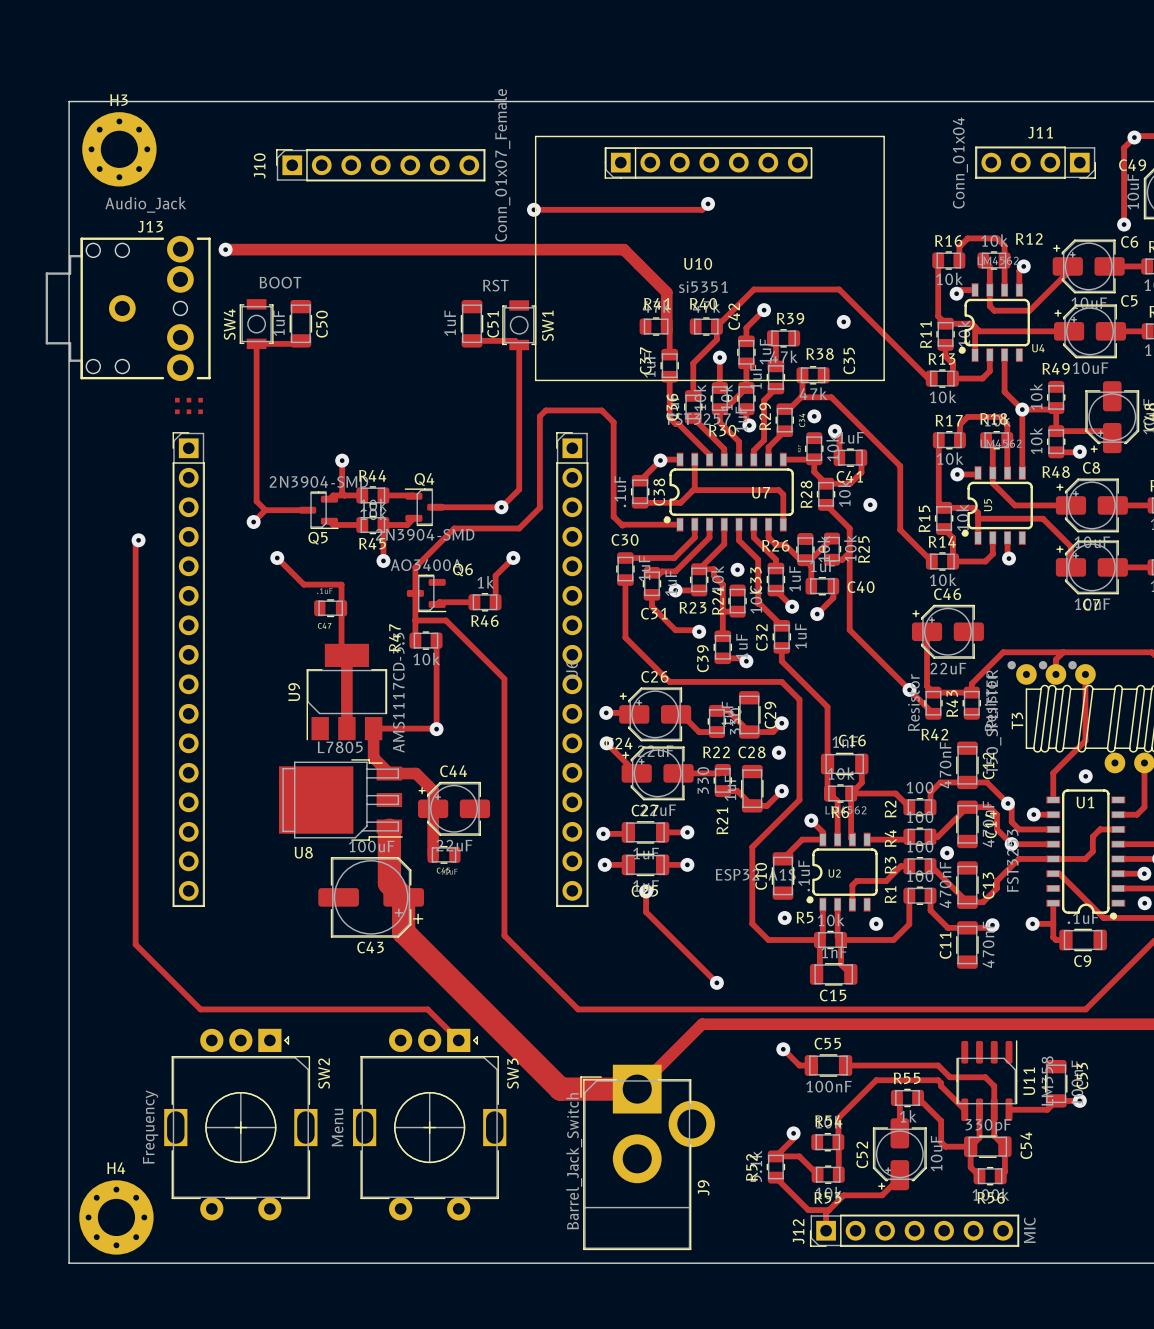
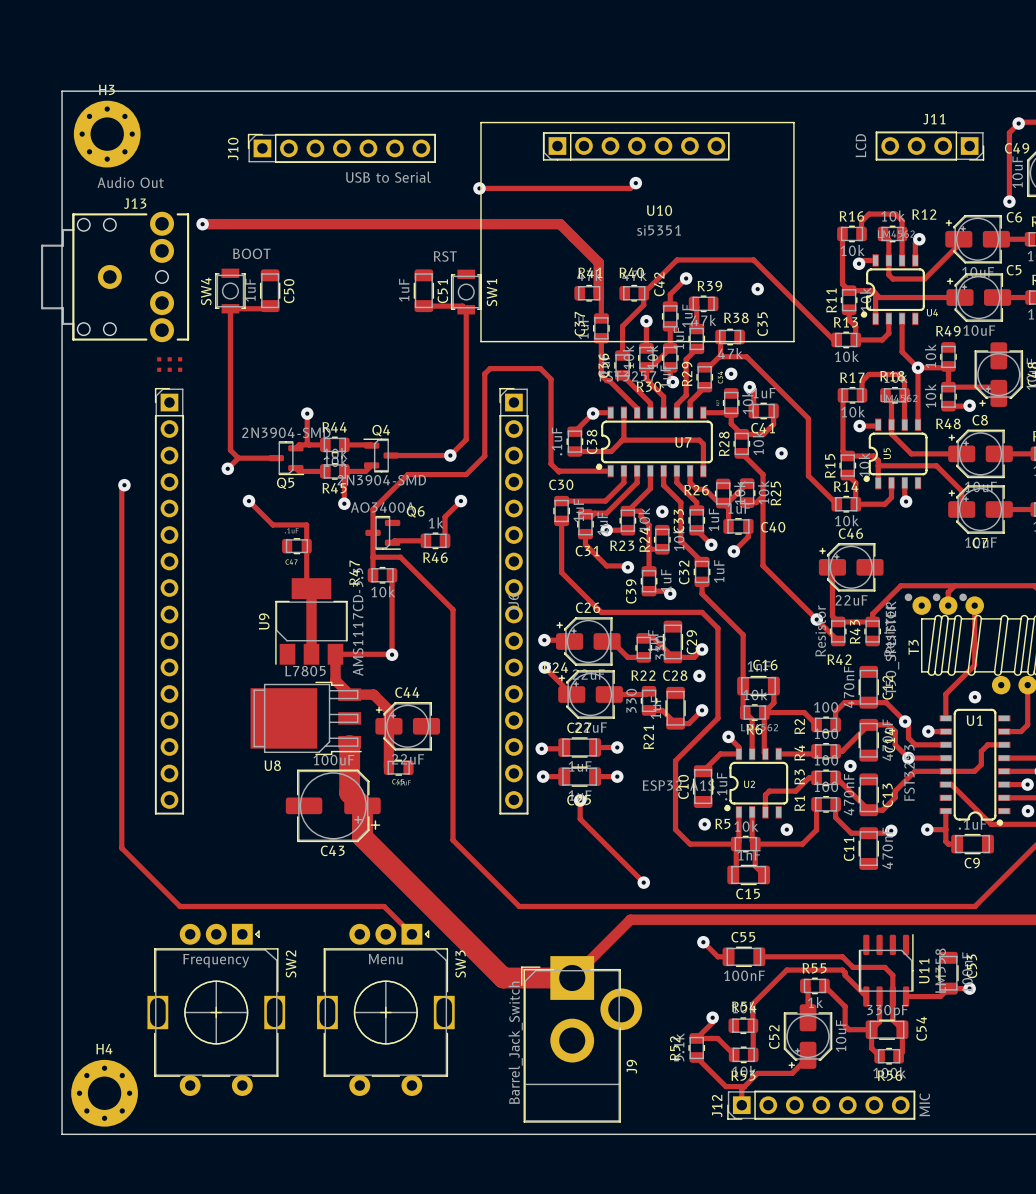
J11 value: Conn_01x04 (960, 163) -> LCD (860, 145)
J10 value: Conn_01x07_Female (502, 165) -> USB to Serial (388, 177)
J13 value: Audio_Jack (145, 204) -> Audio Out (130, 182)
U10 name position: U10 (698, 263) -> U10 (659, 210)
U10 value position: si5351 (703, 287) -> si5351 (659, 230)
SW2 value rotation: 0° (150, 1127) -> 90° clockwise (216, 960)
SW2 value position: Frequency (150, 1127) -> Frequency (216, 960)
SW3 value rotation: 0° (337, 1127) -> 90° clockwise (385, 959)
SW3 value position: Menu (337, 1127) -> Menu (385, 959)

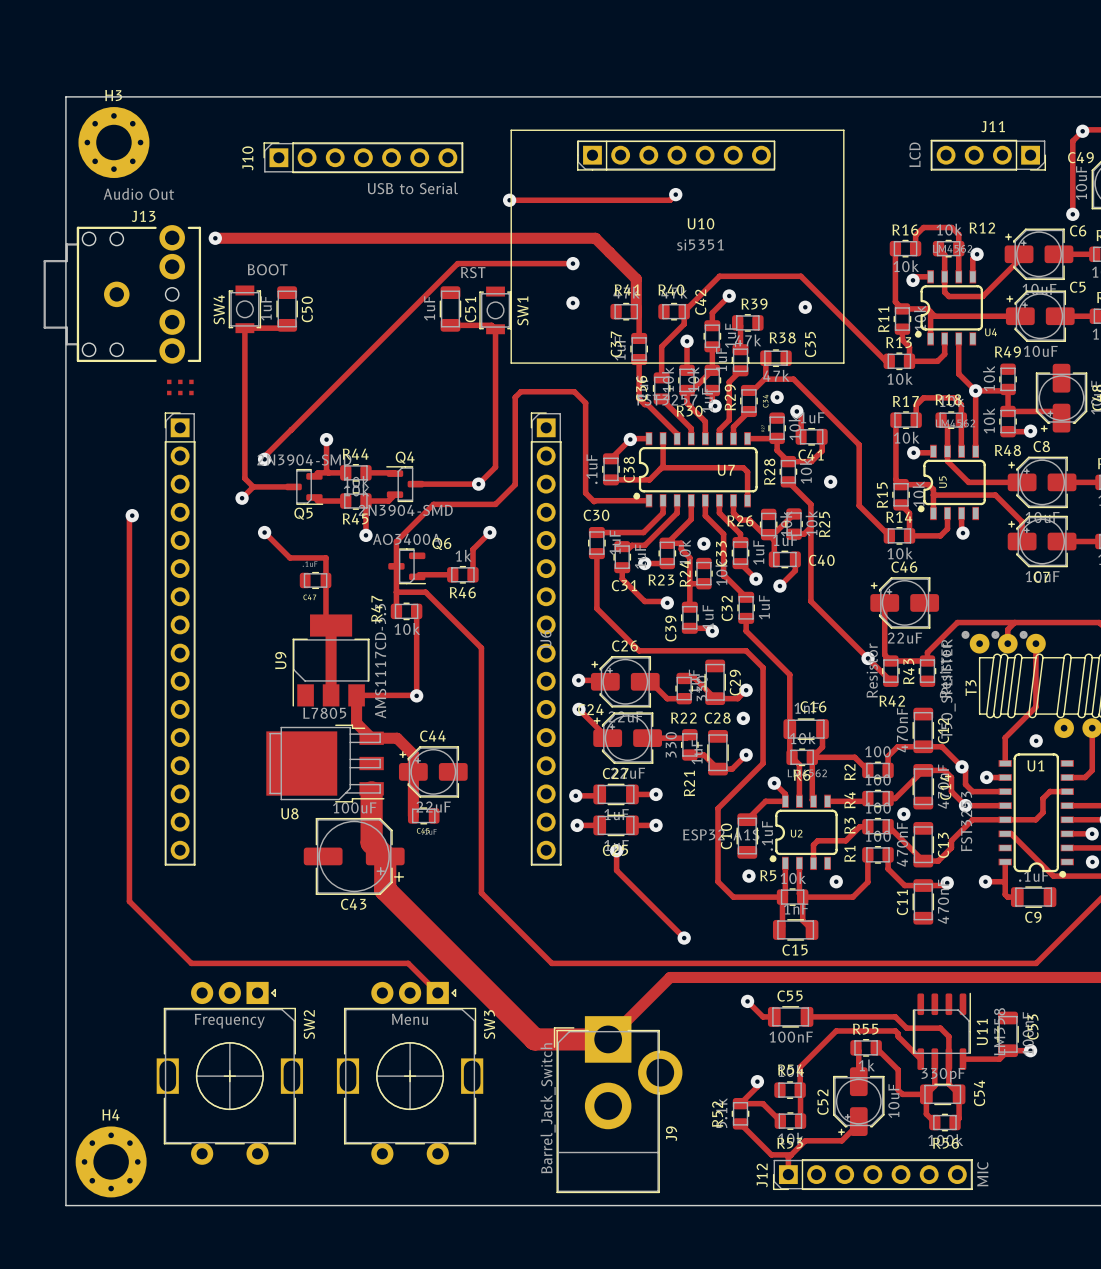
track: none -> (572, 263) (457, 263) (291, 429)
via: none -> (572, 263)
via: none -> (572, 303)
track: none -> (291, 429) (264, 456) (264, 459)
via: none -> (264, 459)

